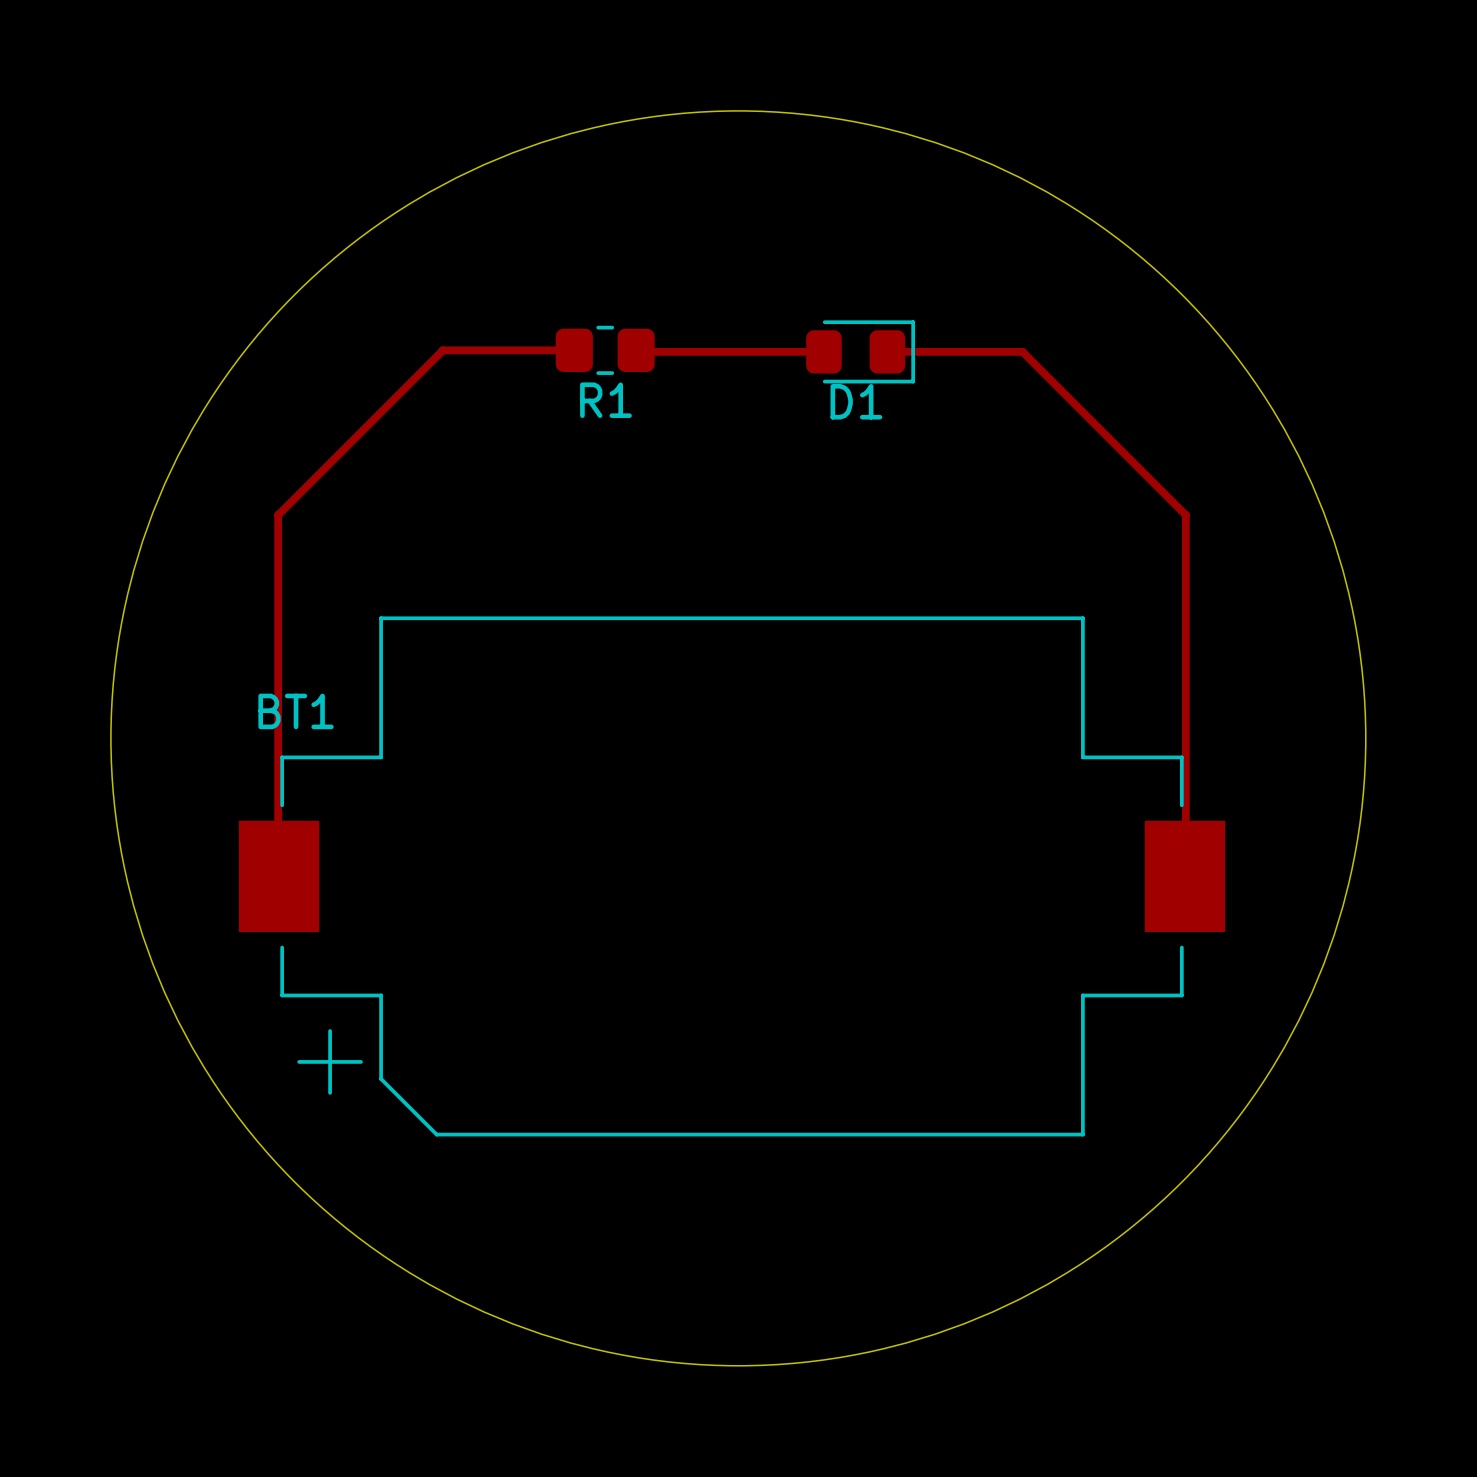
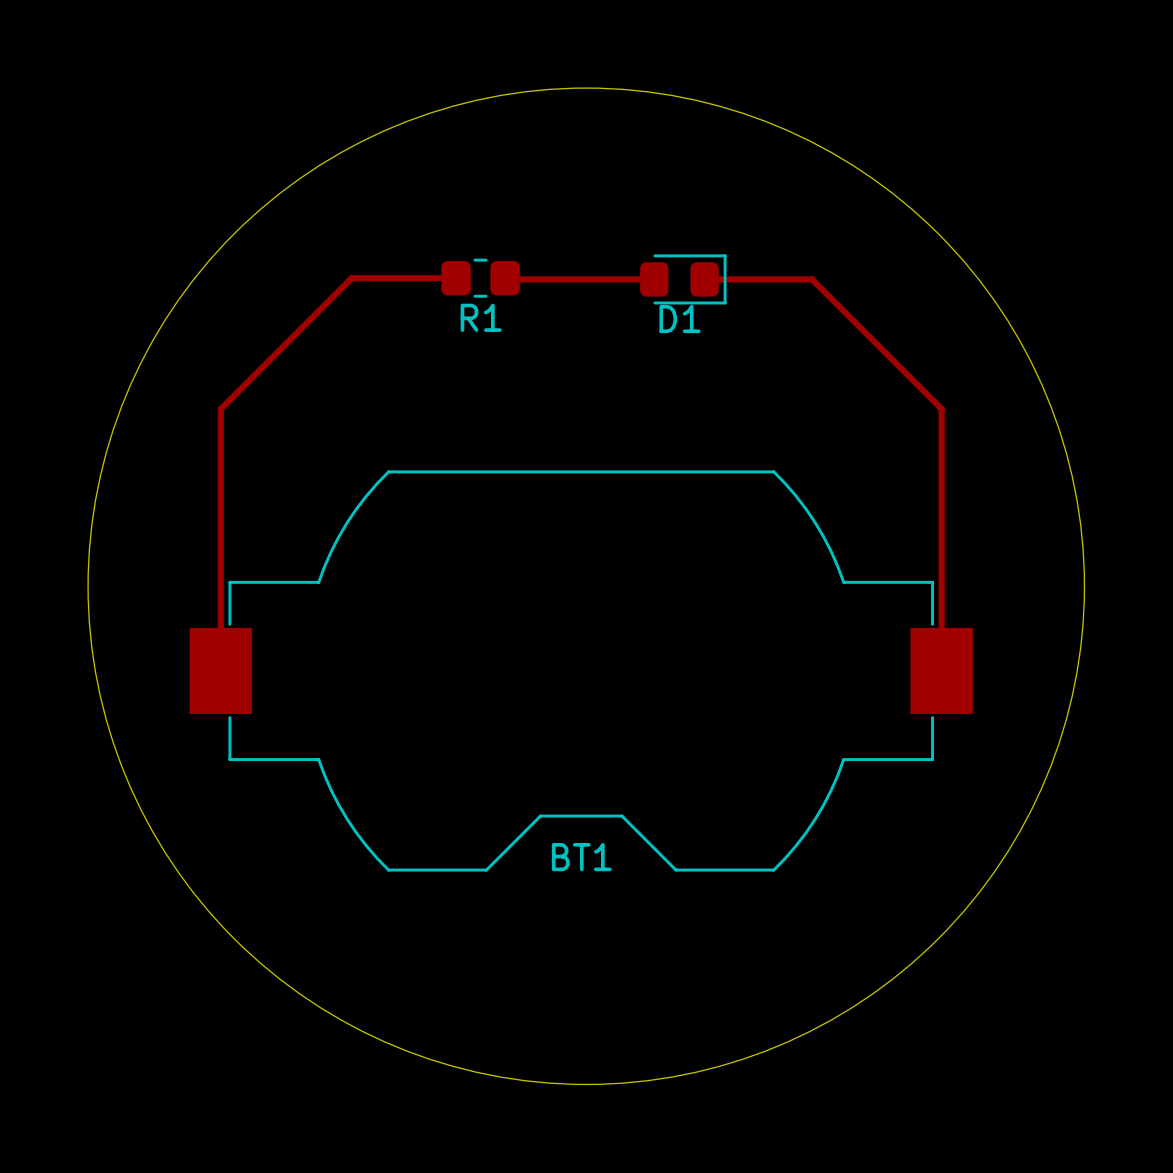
BT1 footprint: [238, 616, 1226, 1137] -> [189, 470, 973, 872]
BT1 name position: BT1 (296, 711) -> BT1 (581, 857)

